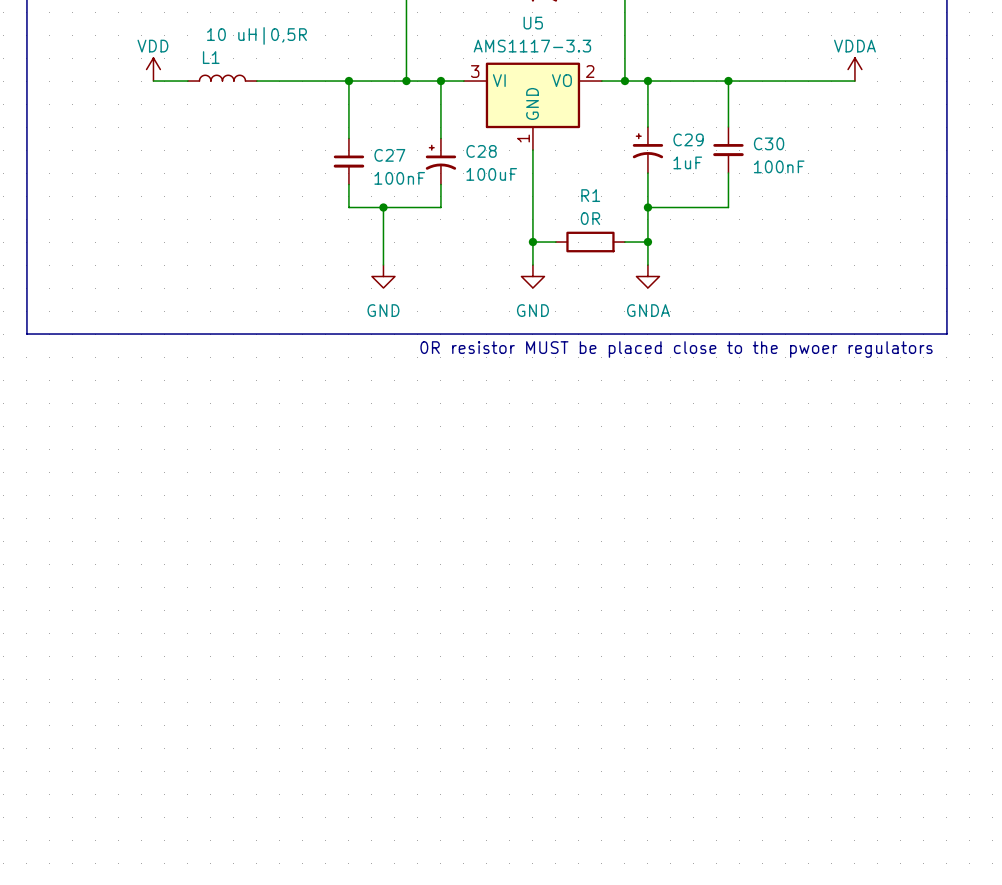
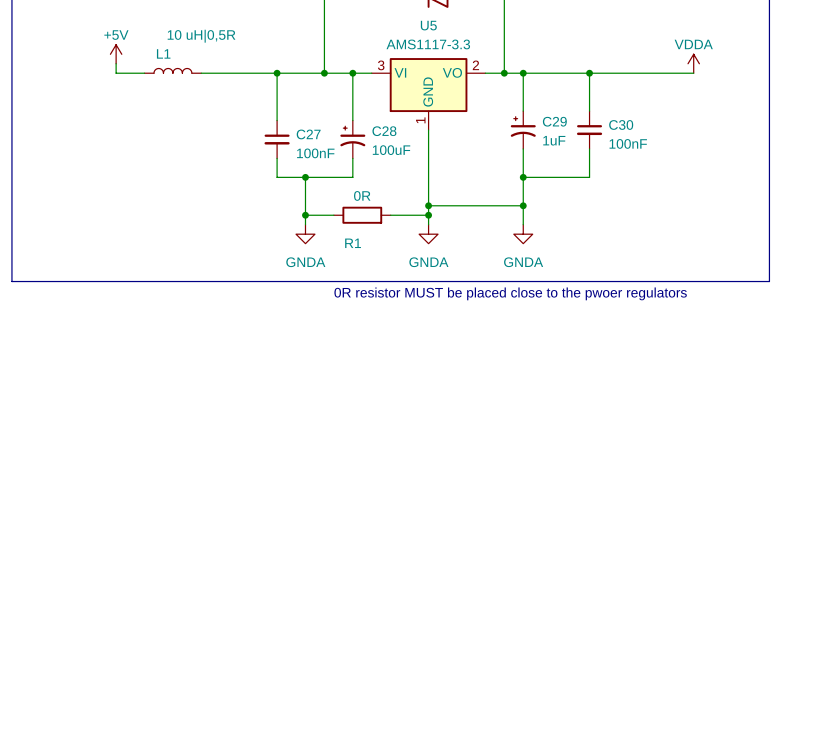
power symbol: none -> +5V (116, 54)
power symbol: VDD (153, 69) -> none
R1 name position: R1 (590, 195) -> R1 (353, 243)
wire: none -> (447, 205) (504, 205)
R1 position: (590, 242) -> (362, 215)
wire: none -> (305, 215) (333, 215)
junction: none -> (305, 215)
wire: none -> (390, 215) (428, 215)
junction: none -> (428, 215)
power symbol: GND (383, 276) -> GNDA (305, 234)
power symbol: GND (532, 276) -> GNDA (428, 234)

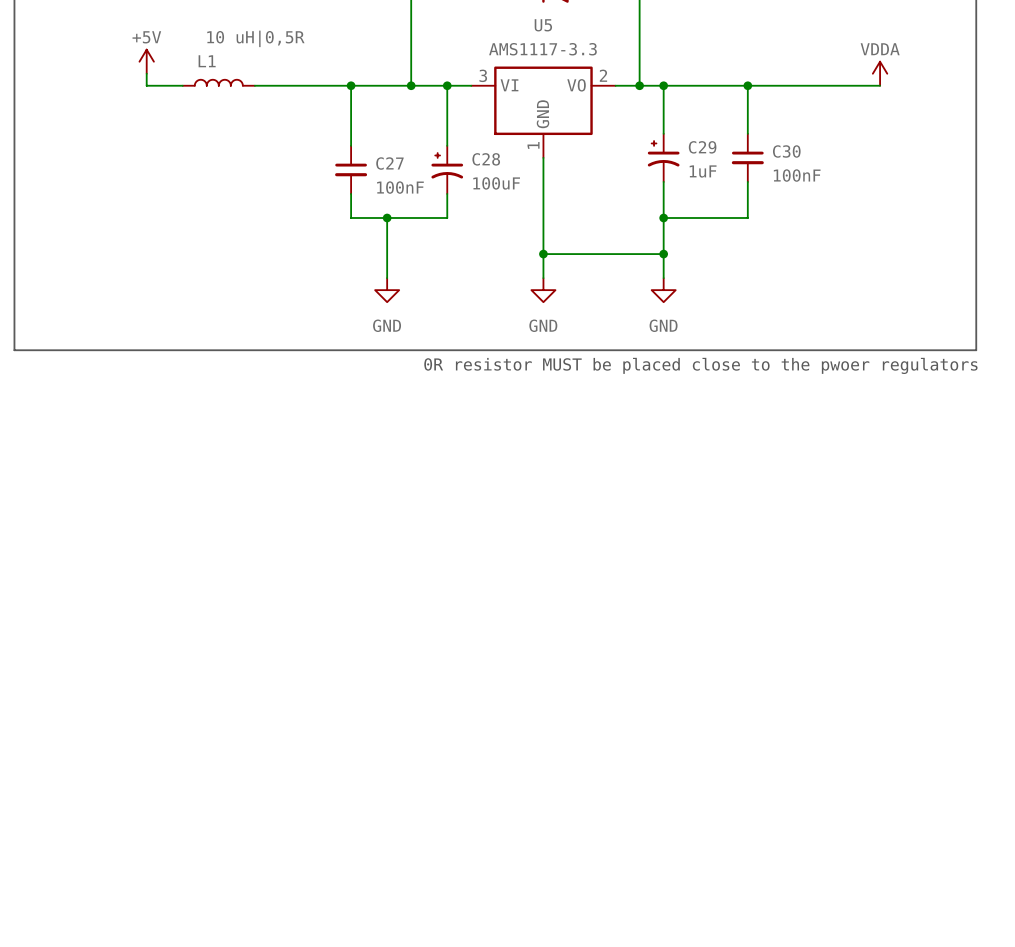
wire: (305, 215) (333, 215) -> none
junction: (305, 215) -> none
R1: 0R (362, 215) -> none
wire: (390, 215) (428, 215) -> none
junction: (428, 215) -> none
power symbol: GNDA (305, 234) -> GND (387, 290)
power symbol: GNDA (428, 234) -> GND (543, 290)
power symbol: GNDA (523, 234) -> GND (663, 290)

